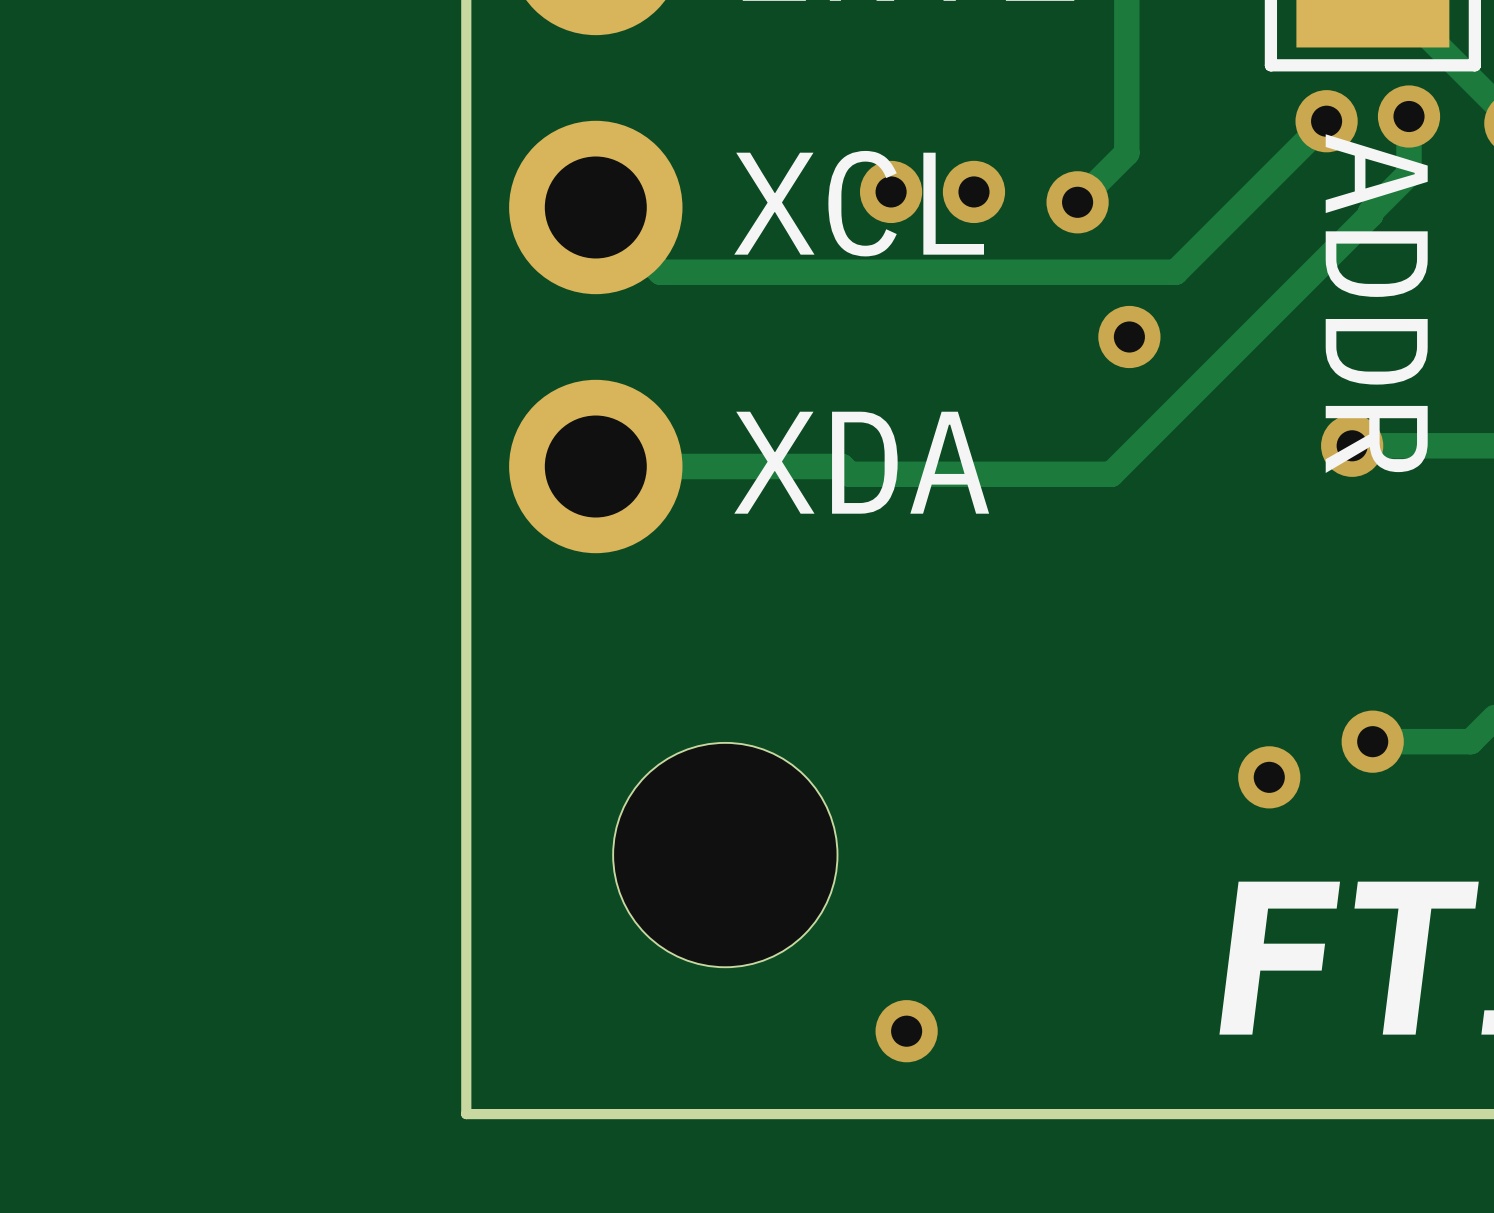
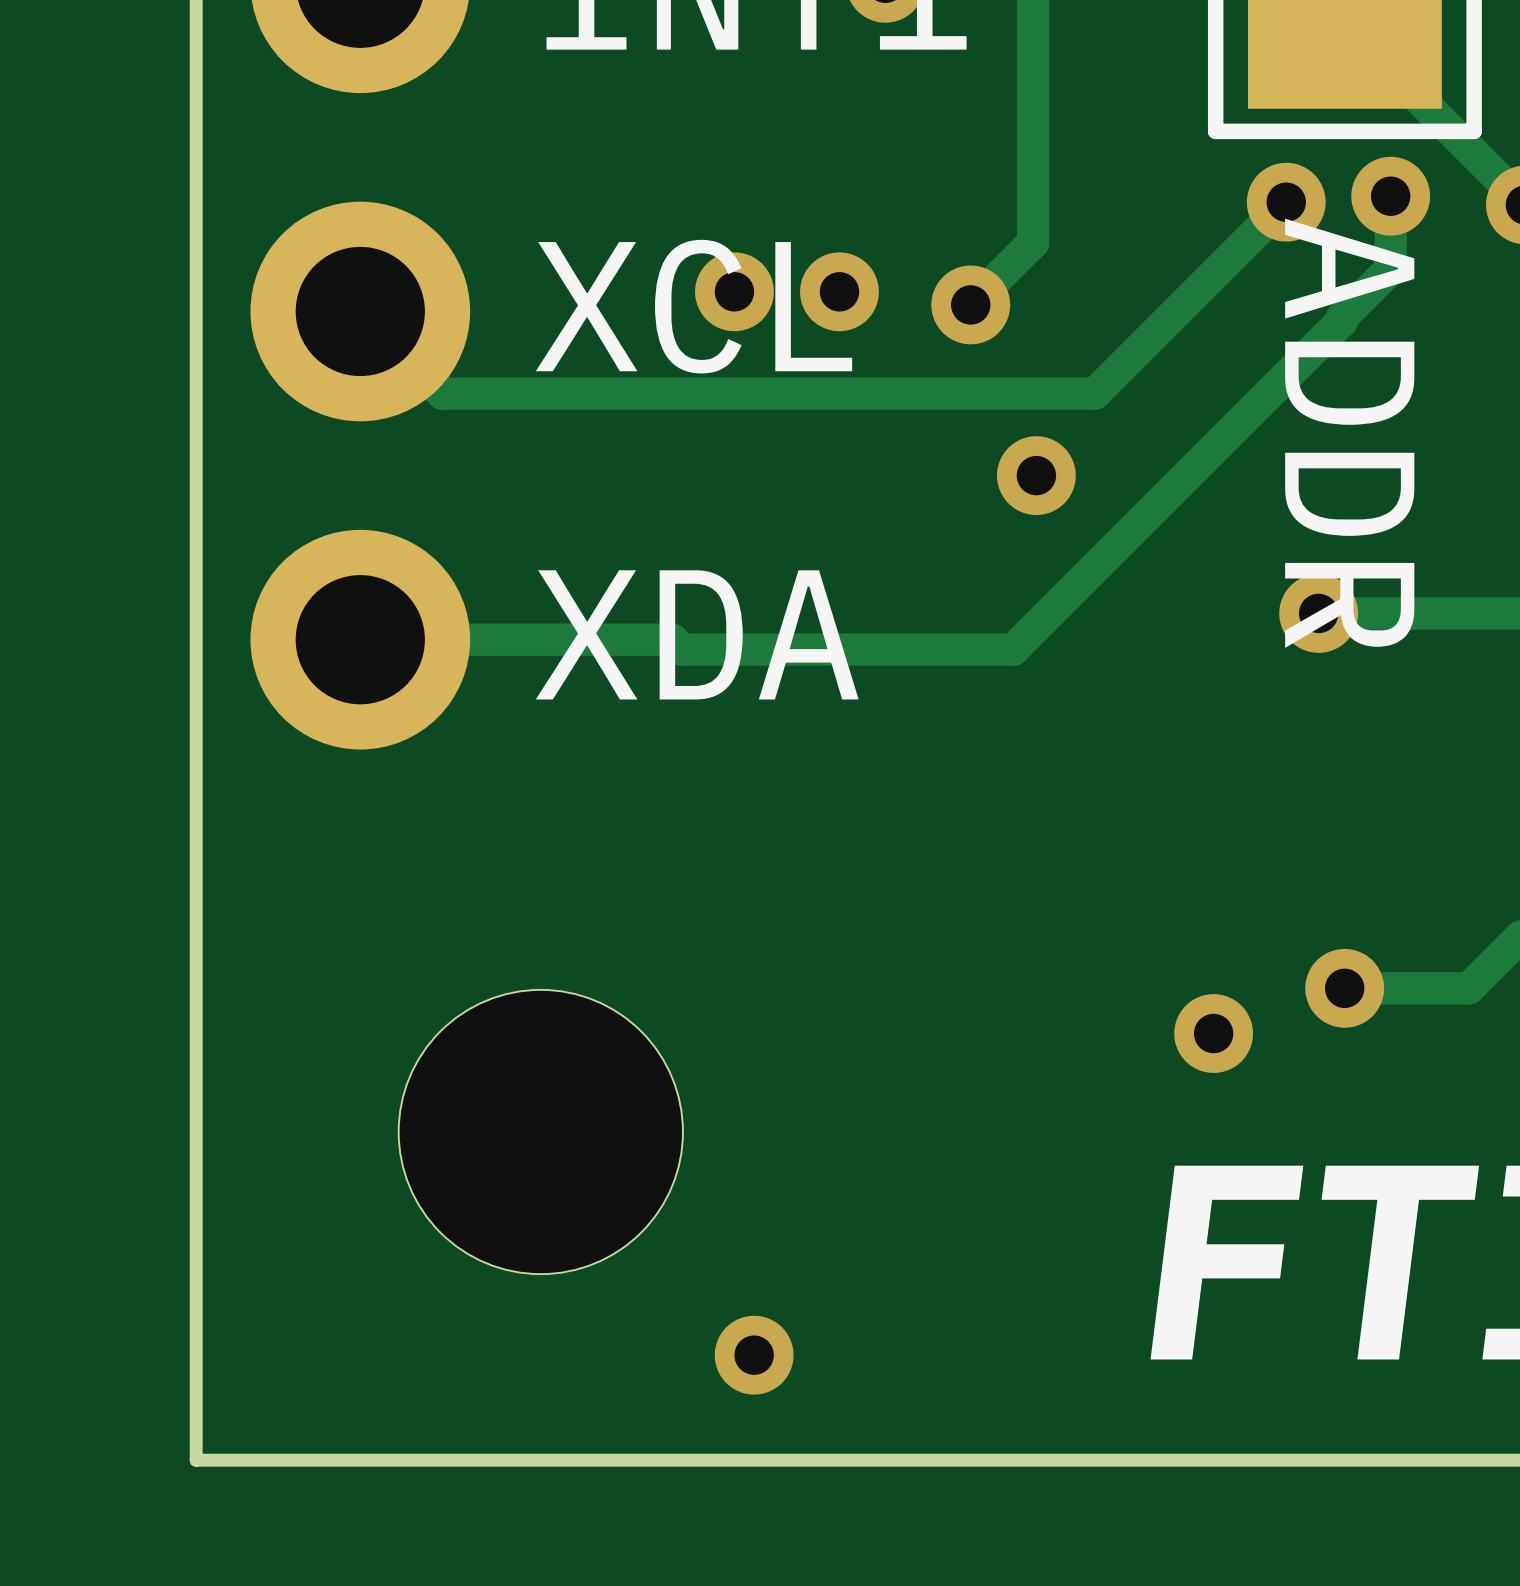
part position: (725, 855) -> (540, 1131)

